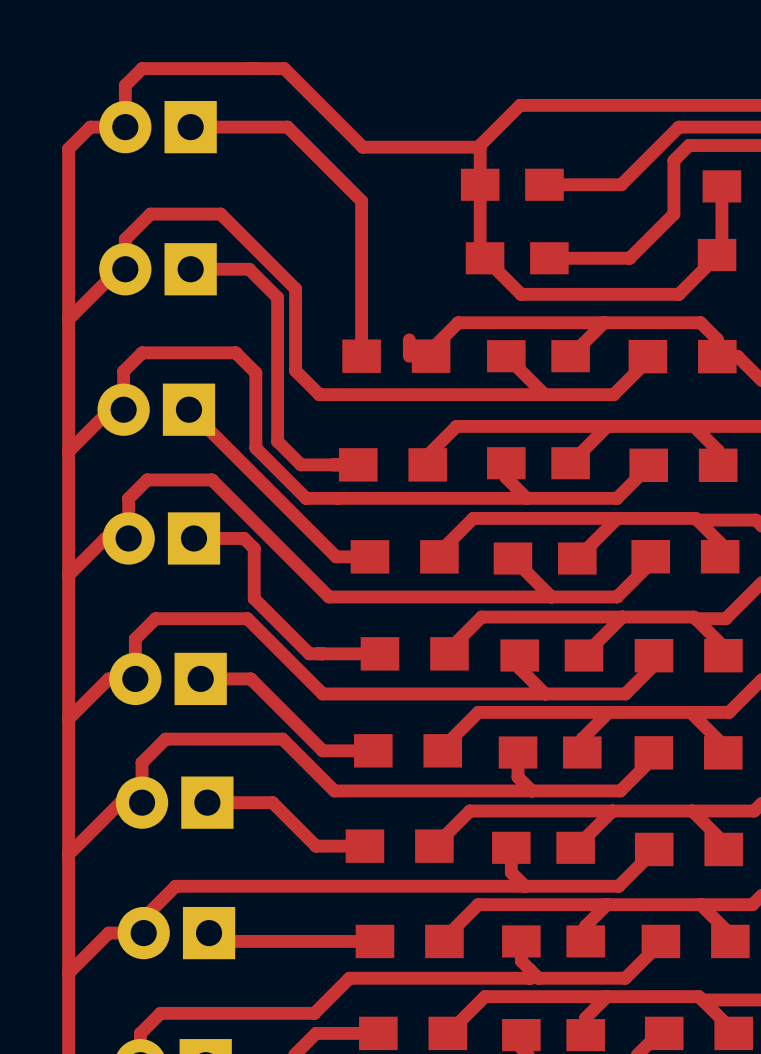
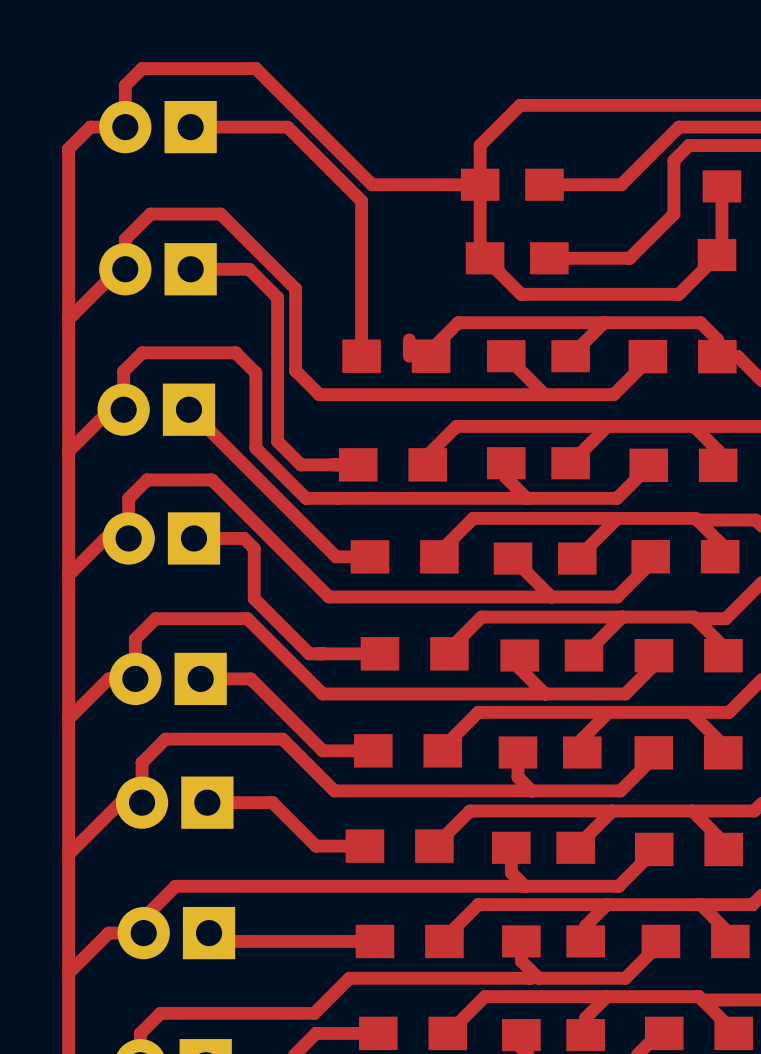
top track: (255, 68) (284, 68) (362, 147) (480, 147) -> (255, 68) (372, 184) (480, 184)

